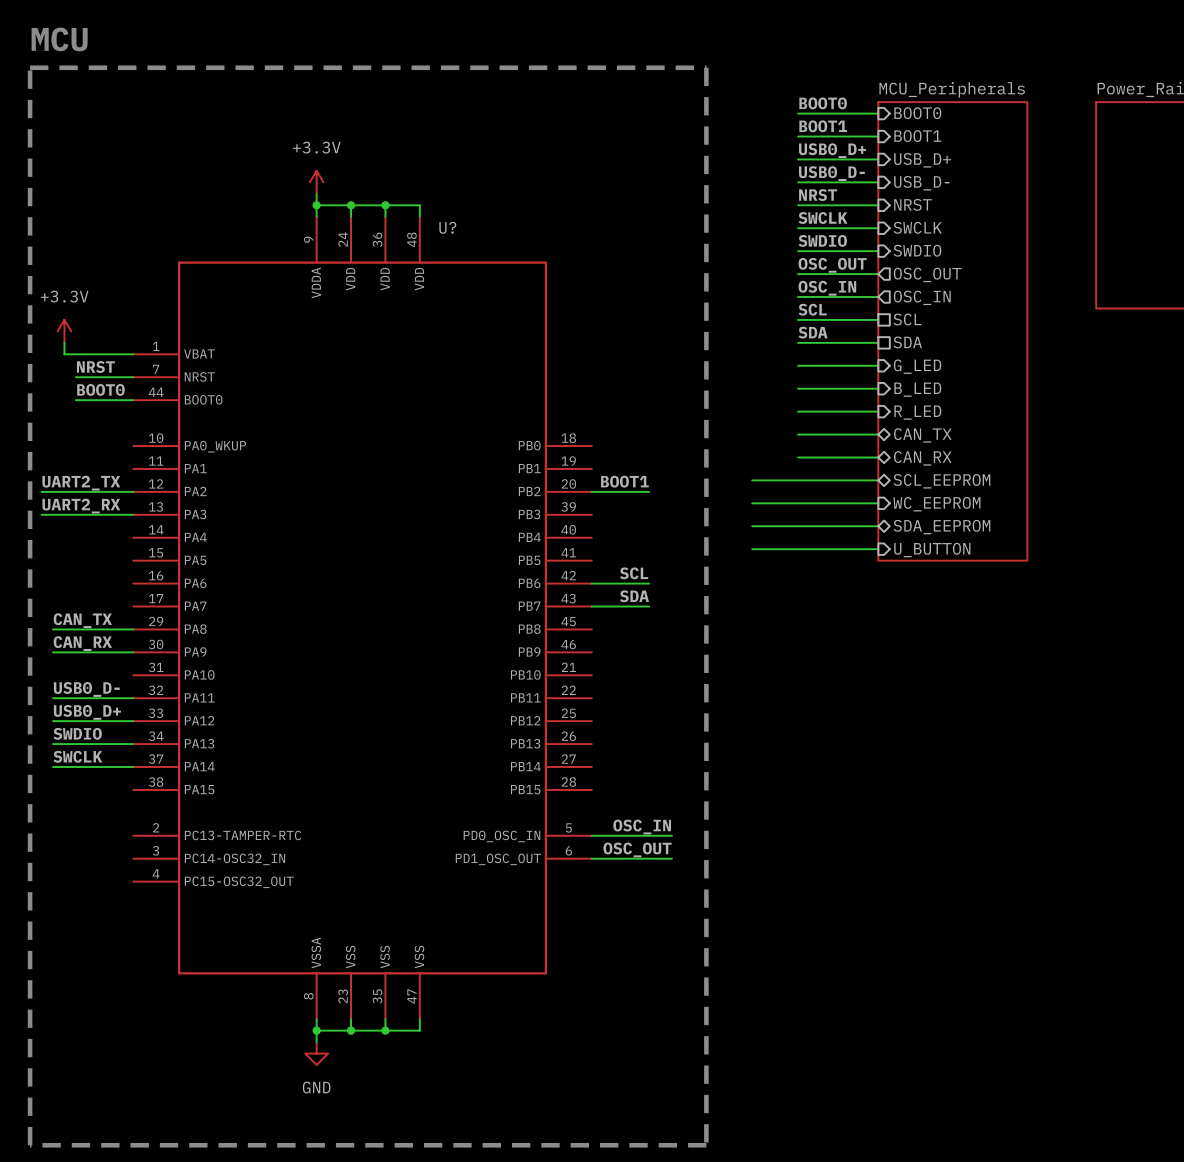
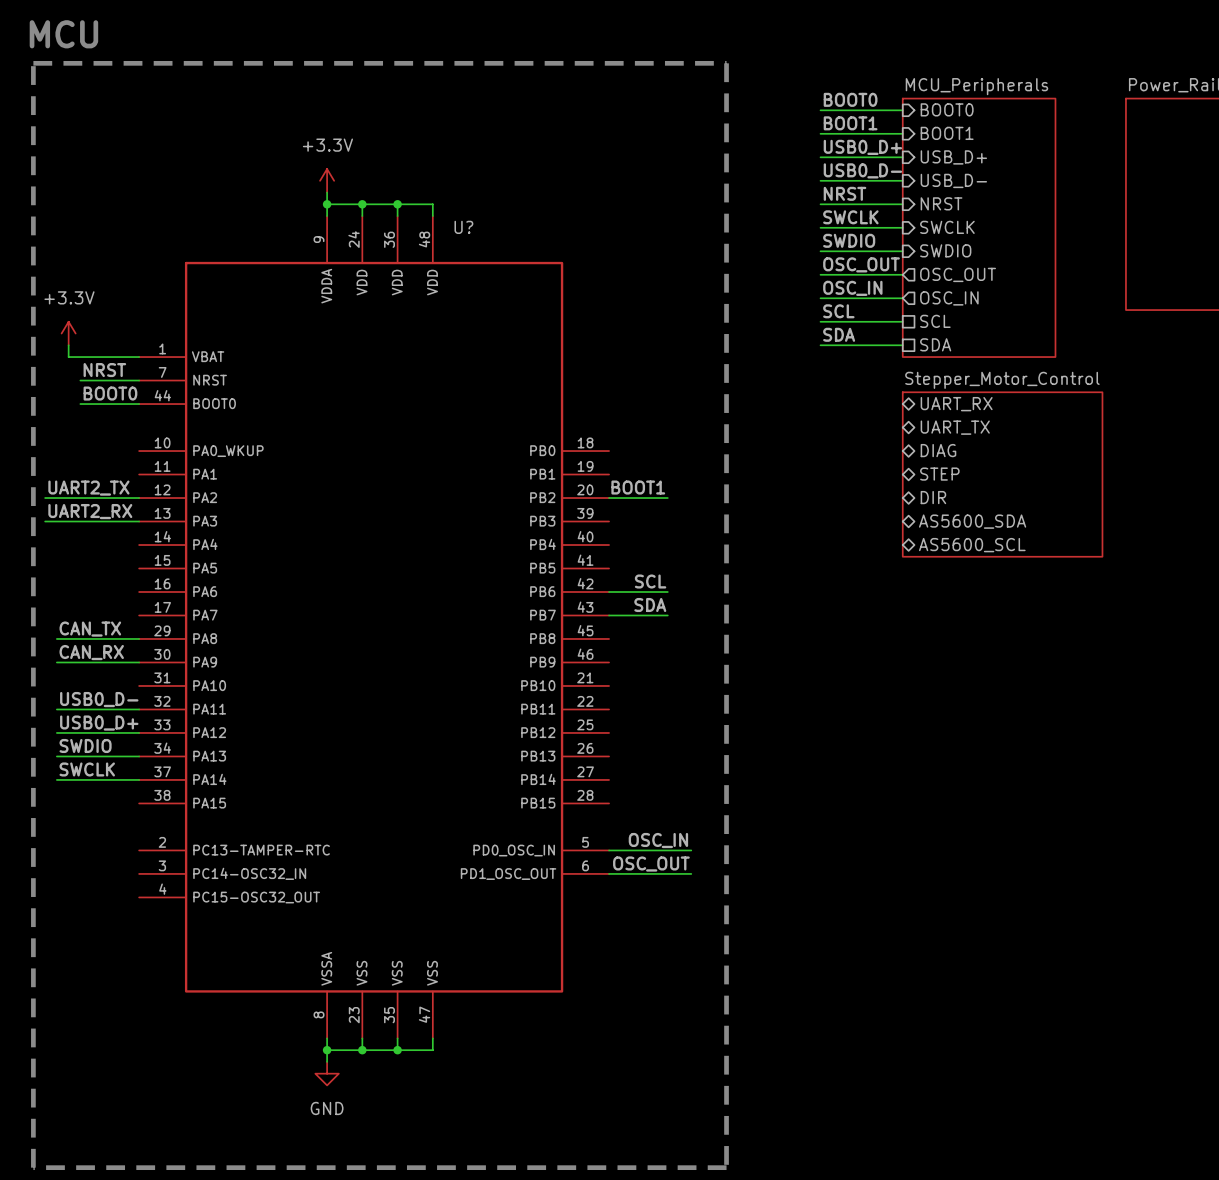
sheet MCU_Peripherals: none -> (979, 227)
sheet MCU_Peripherals: (952, 331) -> none
wire: (798, 365) (878, 365) -> none
sheet pin: G_LED (917, 366) -> none
wire: (798, 388) (878, 388) -> none
sheet pin: B_LED (917, 389) -> none
sheet pin: none -> UART_RX (956, 404)
wire: (798, 411) (878, 411) -> none
sheet pin: R_LED (917, 412) -> none
wire: (798, 434) (878, 434) -> none
sheet pin: CAN_TX (922, 435) -> UART_TX (955, 427)
sheet pin: none -> DIAG (938, 450)
wire: (798, 457) (878, 457) -> none
sheet pin: CAN_RX (922, 458) -> none
sheet pin: none -> STEP (939, 474)
sheet Stepper_Motor_Control: none -> (1002, 474)
wire: (752, 480) (878, 480) -> none
sheet pin: SCL_EEPROM (941, 481) -> none
sheet pin: none -> DIR (933, 497)
wire: (752, 503) (878, 503) -> none
sheet pin: WC_EEPROM (936, 504) -> none
sheet pin: none -> AS5600_SDA (972, 521)
wire: (752, 526) (878, 526) -> none
sheet pin: SDA_EEPROM (941, 527) -> none
sheet pin: none -> AS5600_SCL (972, 545)
wire: (752, 549) (878, 549) -> none
sheet pin: U_BUTTON (932, 550) -> none

